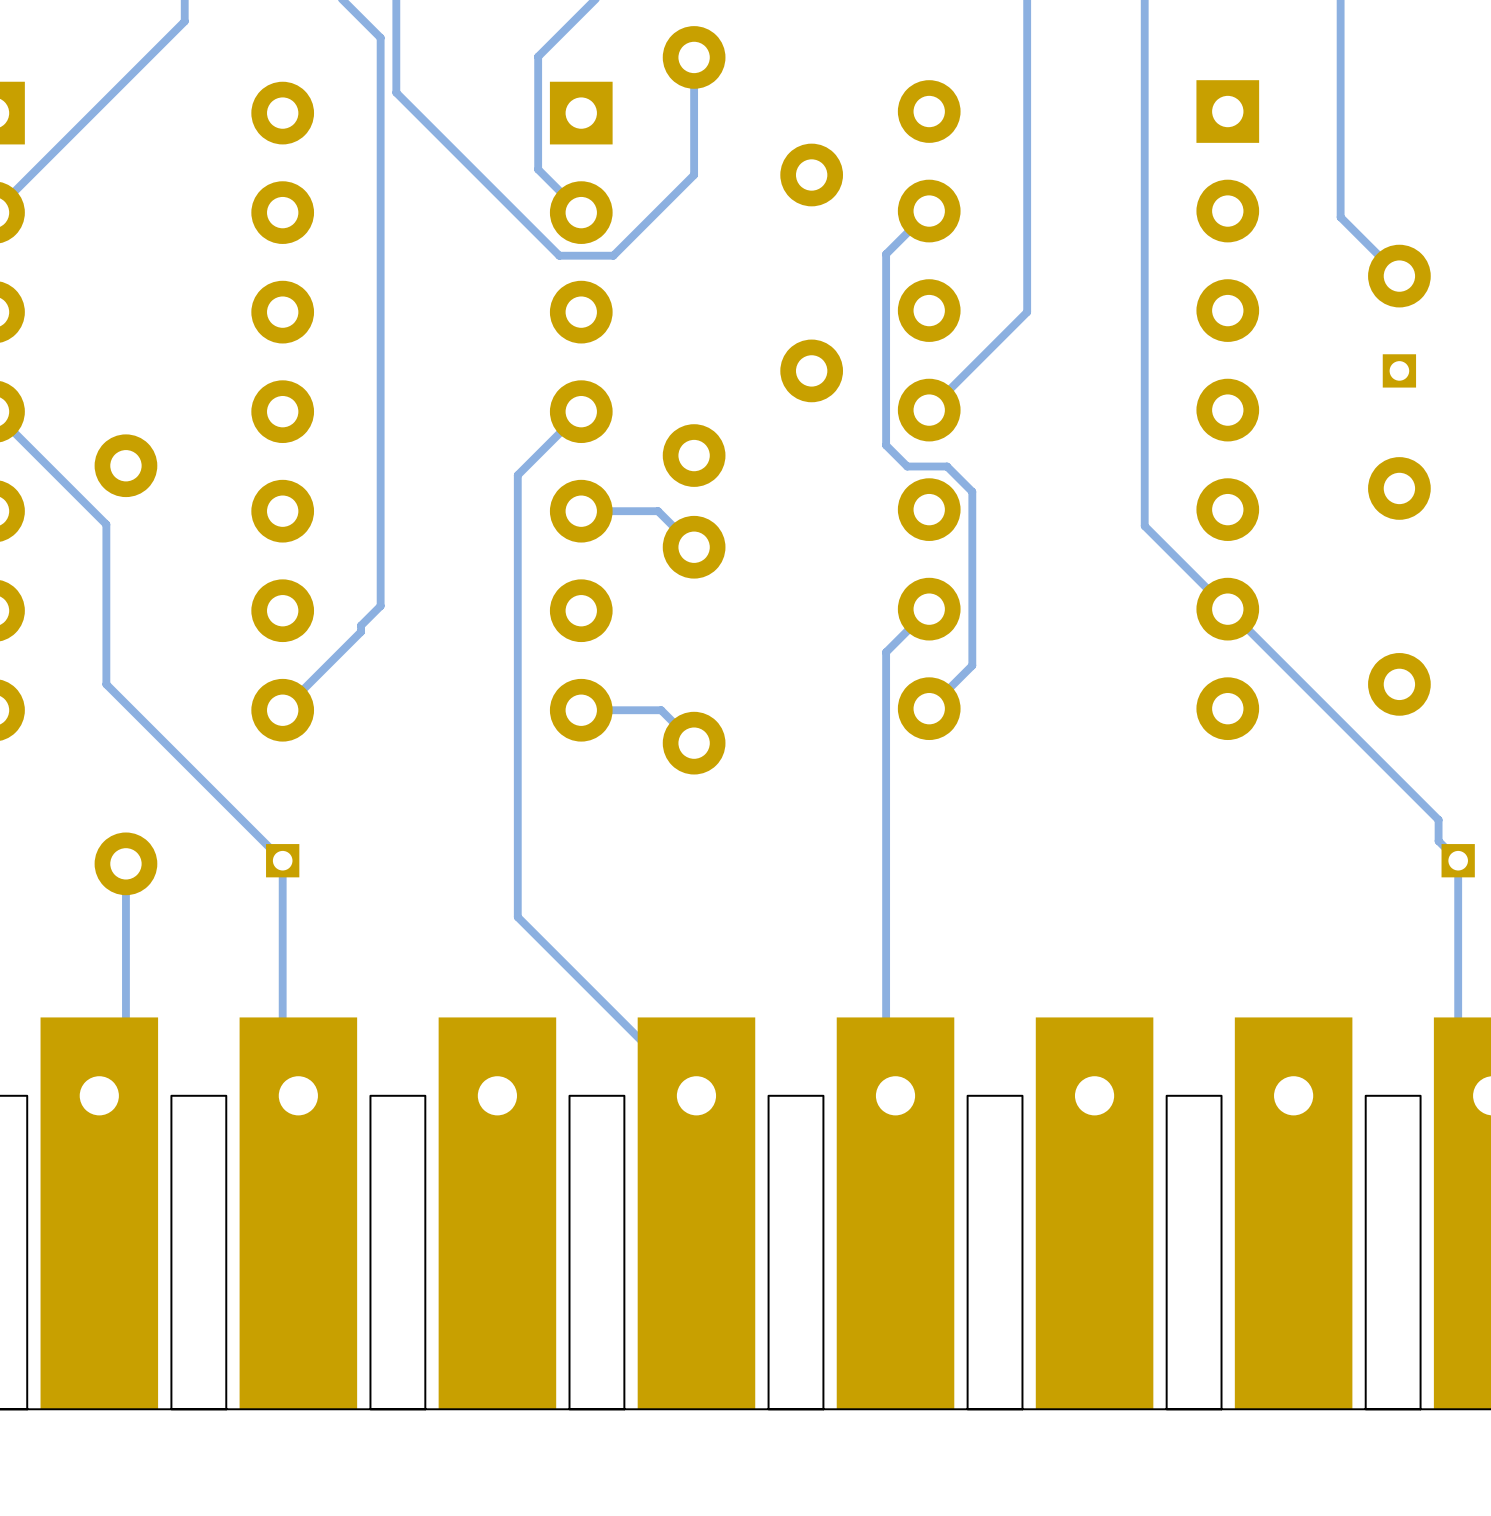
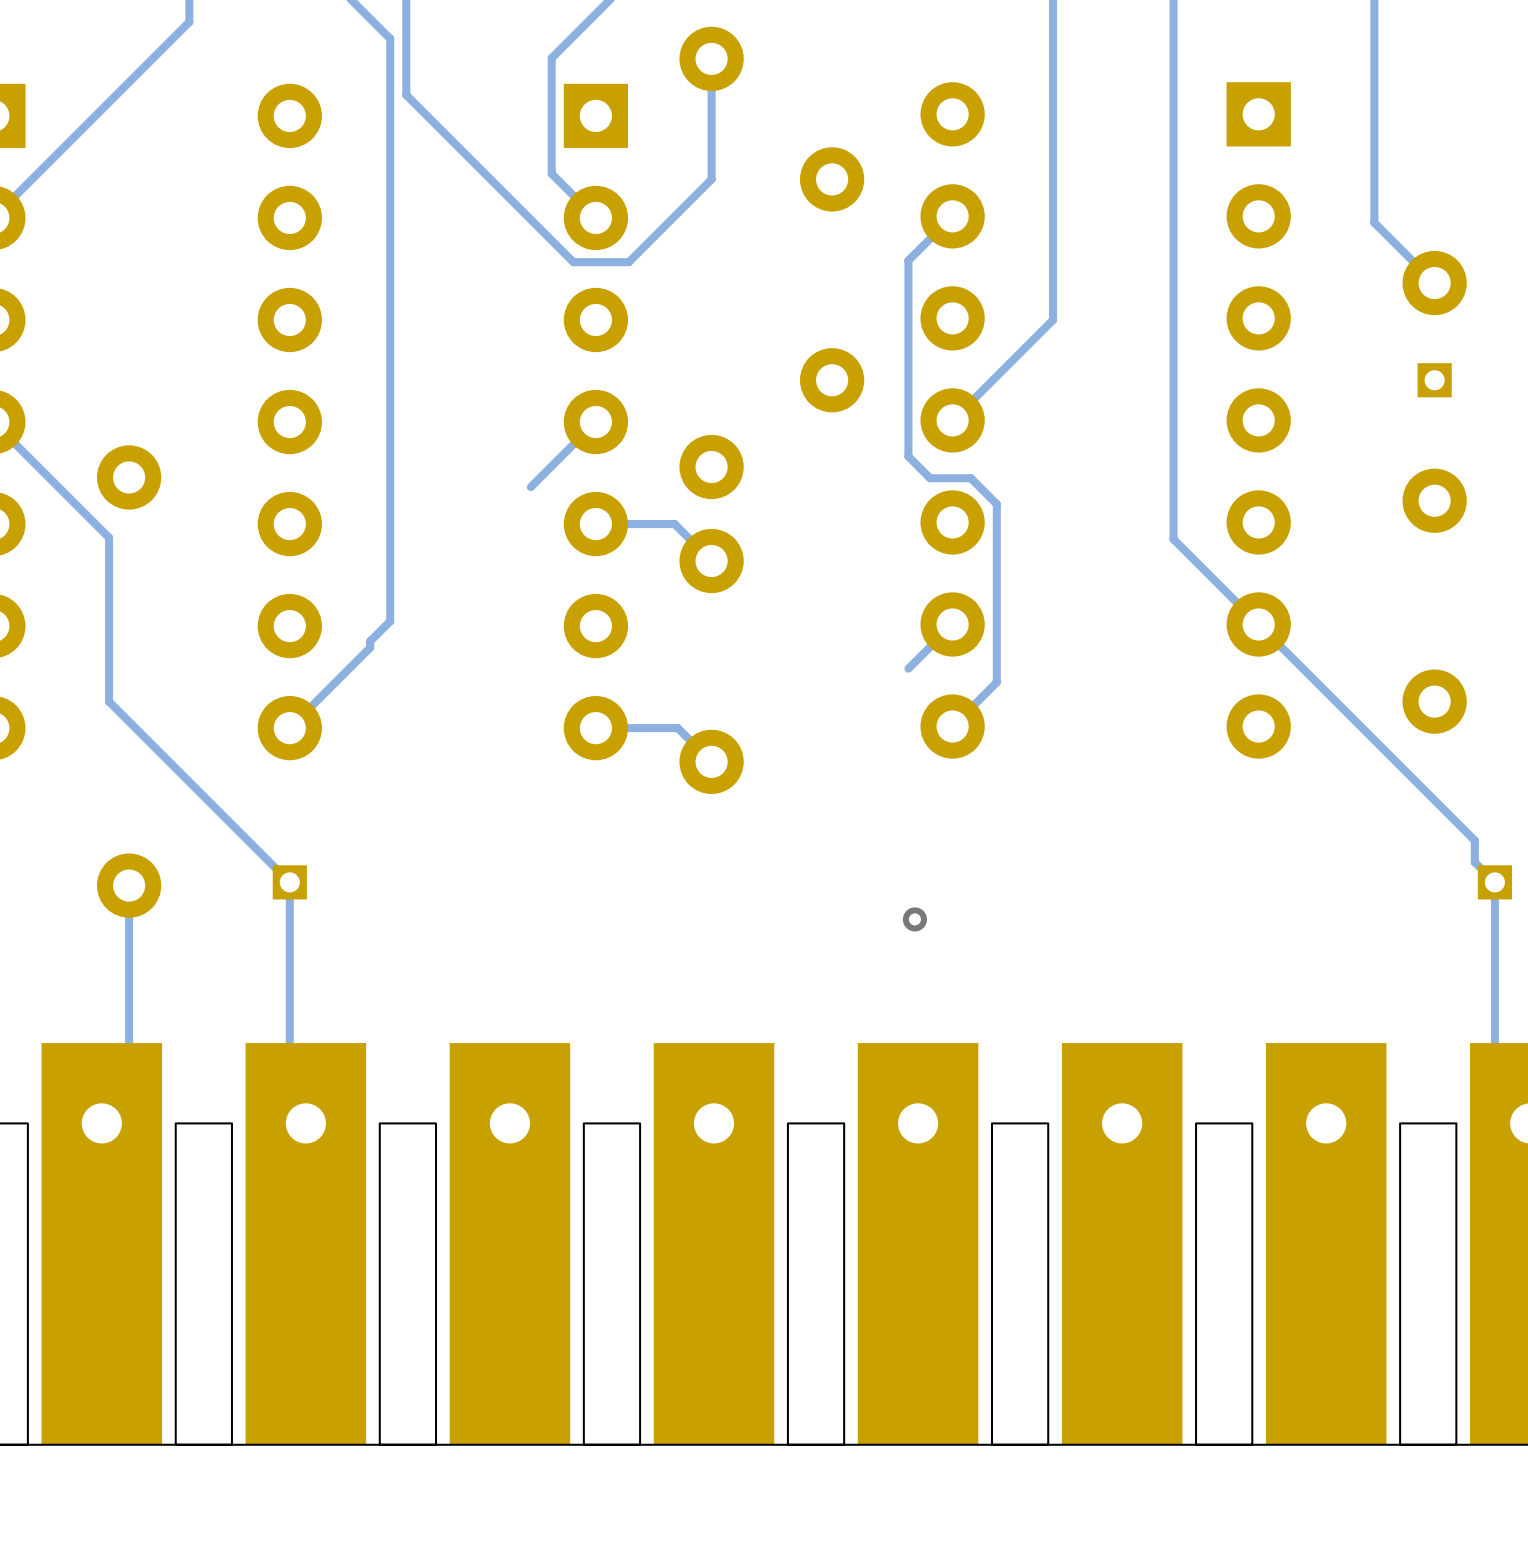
track: (517, 475) (517, 917) (696, 1095) -> none
track: (886, 652) (886, 1091) -> none
via: none -> (914, 919)

